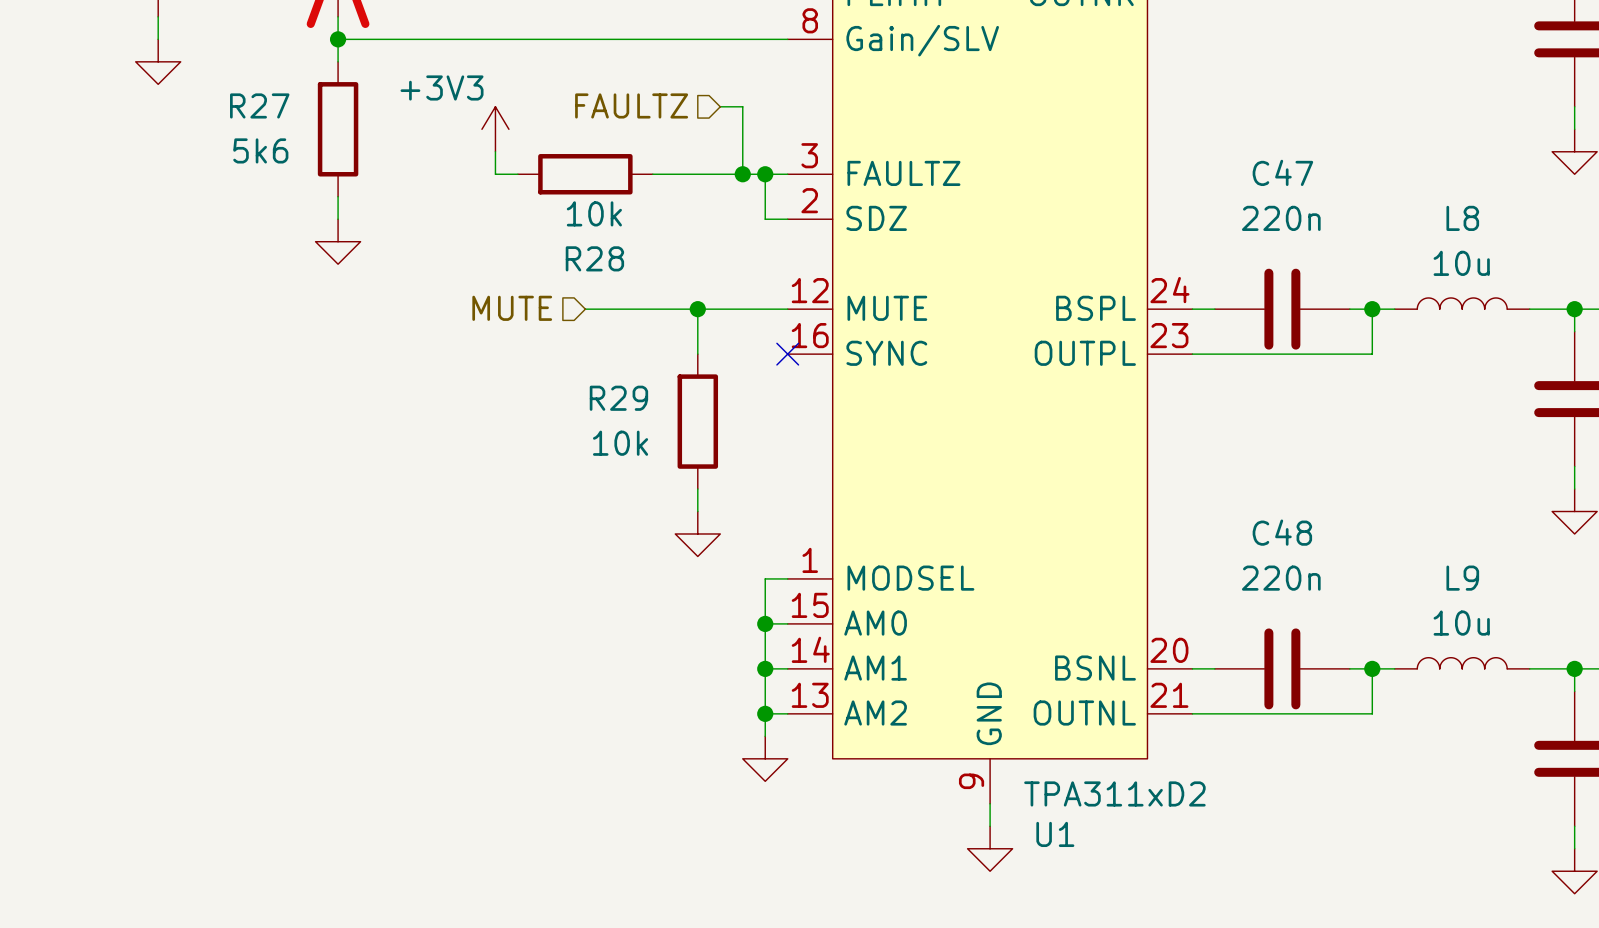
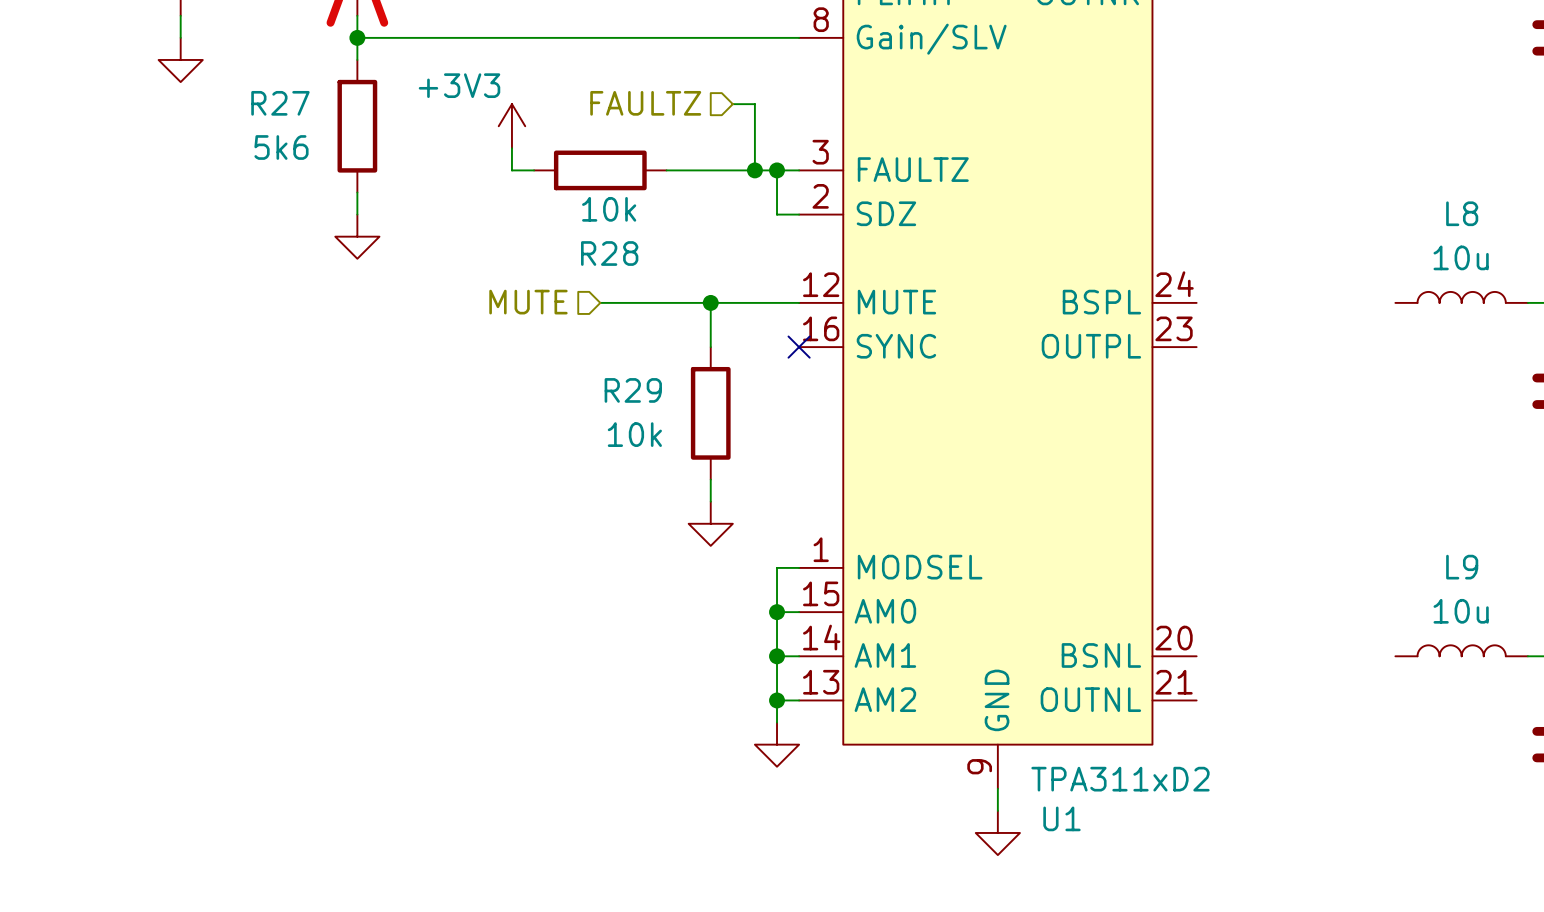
wire: (1192, 309) (1214, 309) -> none
C47: 220n (1282, 309) -> none
wire: (1349, 309) (1394, 309) -> none
wire: (1372, 309) (1372, 354) (1192, 354) -> none
junction: (1372, 309) -> none
wire: (1192, 668) (1214, 668) -> none
C48: 220n (1282, 668) -> none
wire: (1349, 668) (1394, 668) -> none
wire: (1372, 668) (1372, 713) (1192, 713) -> none
junction: (1372, 668) -> none

